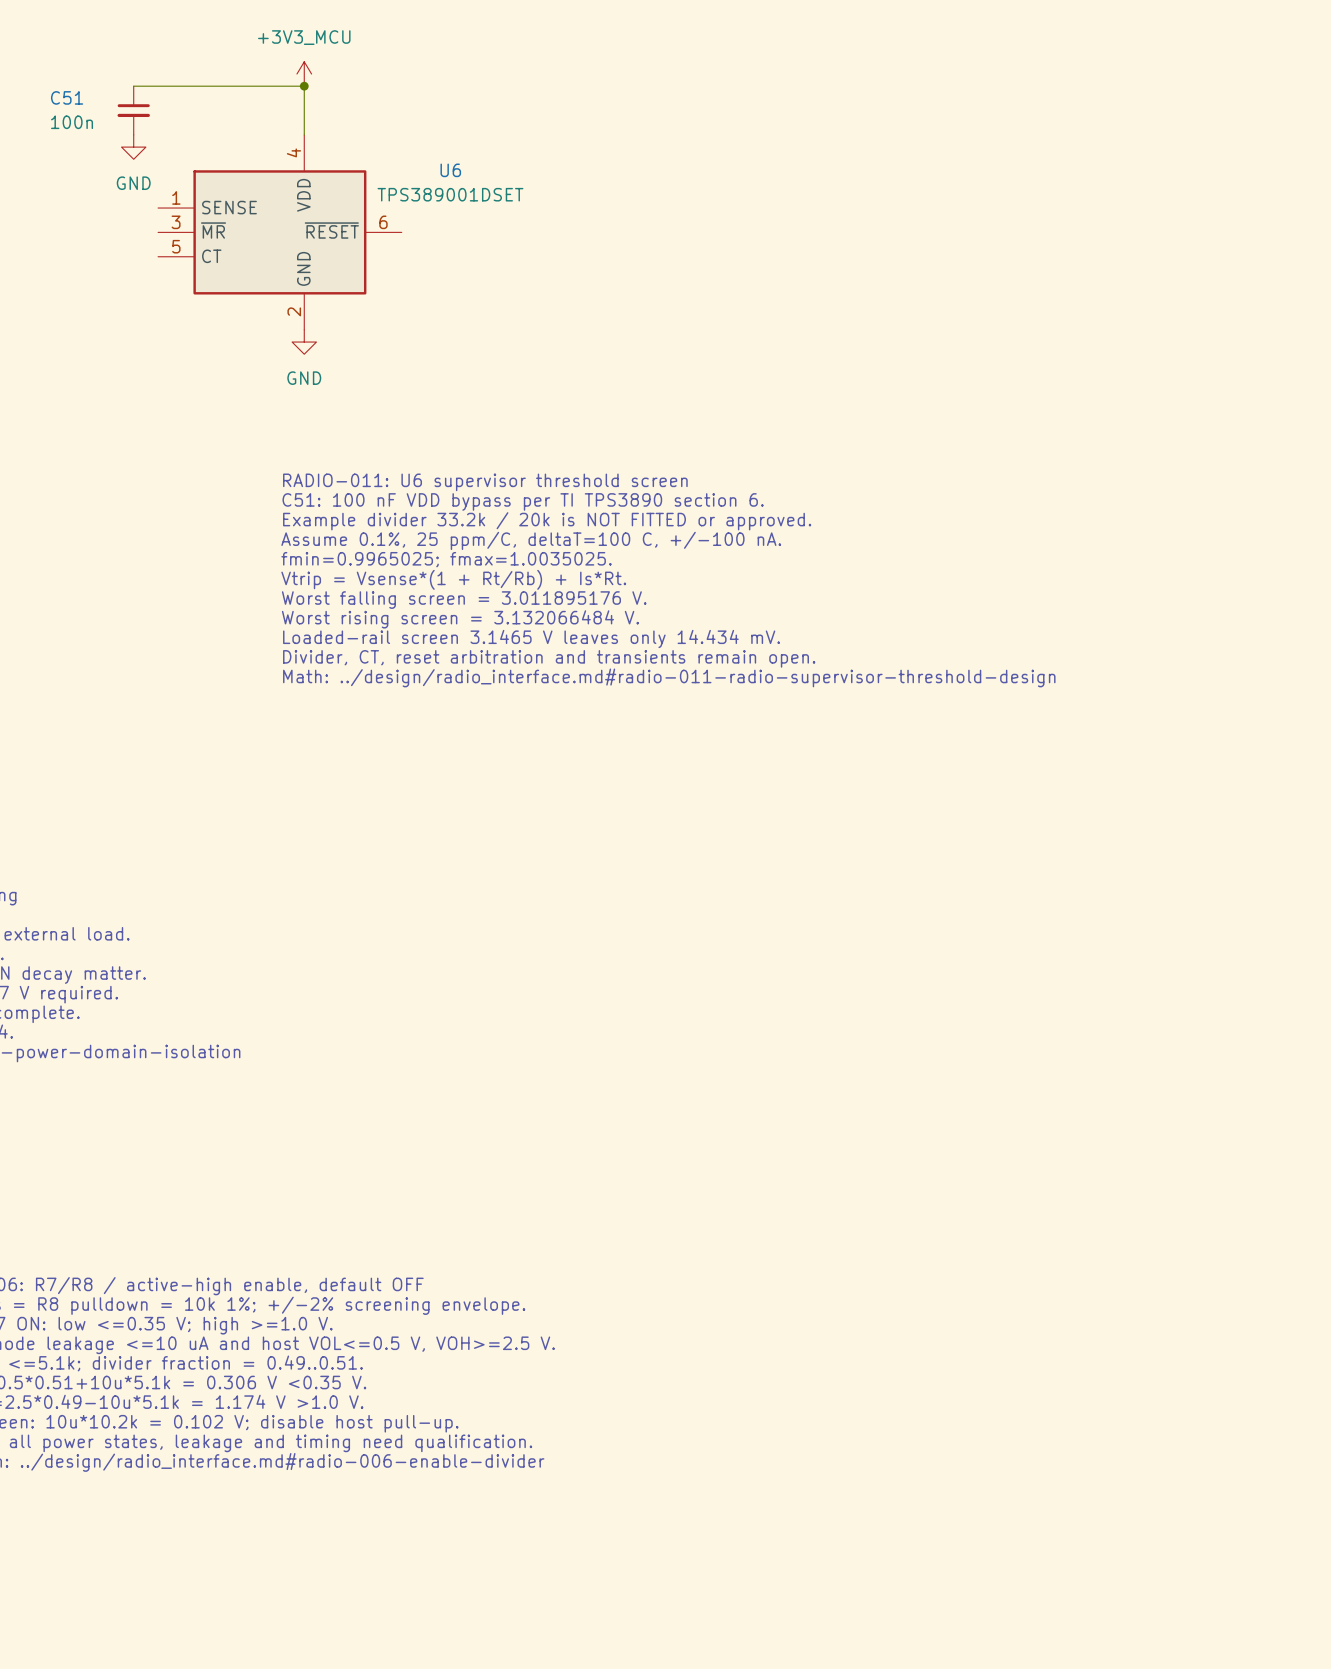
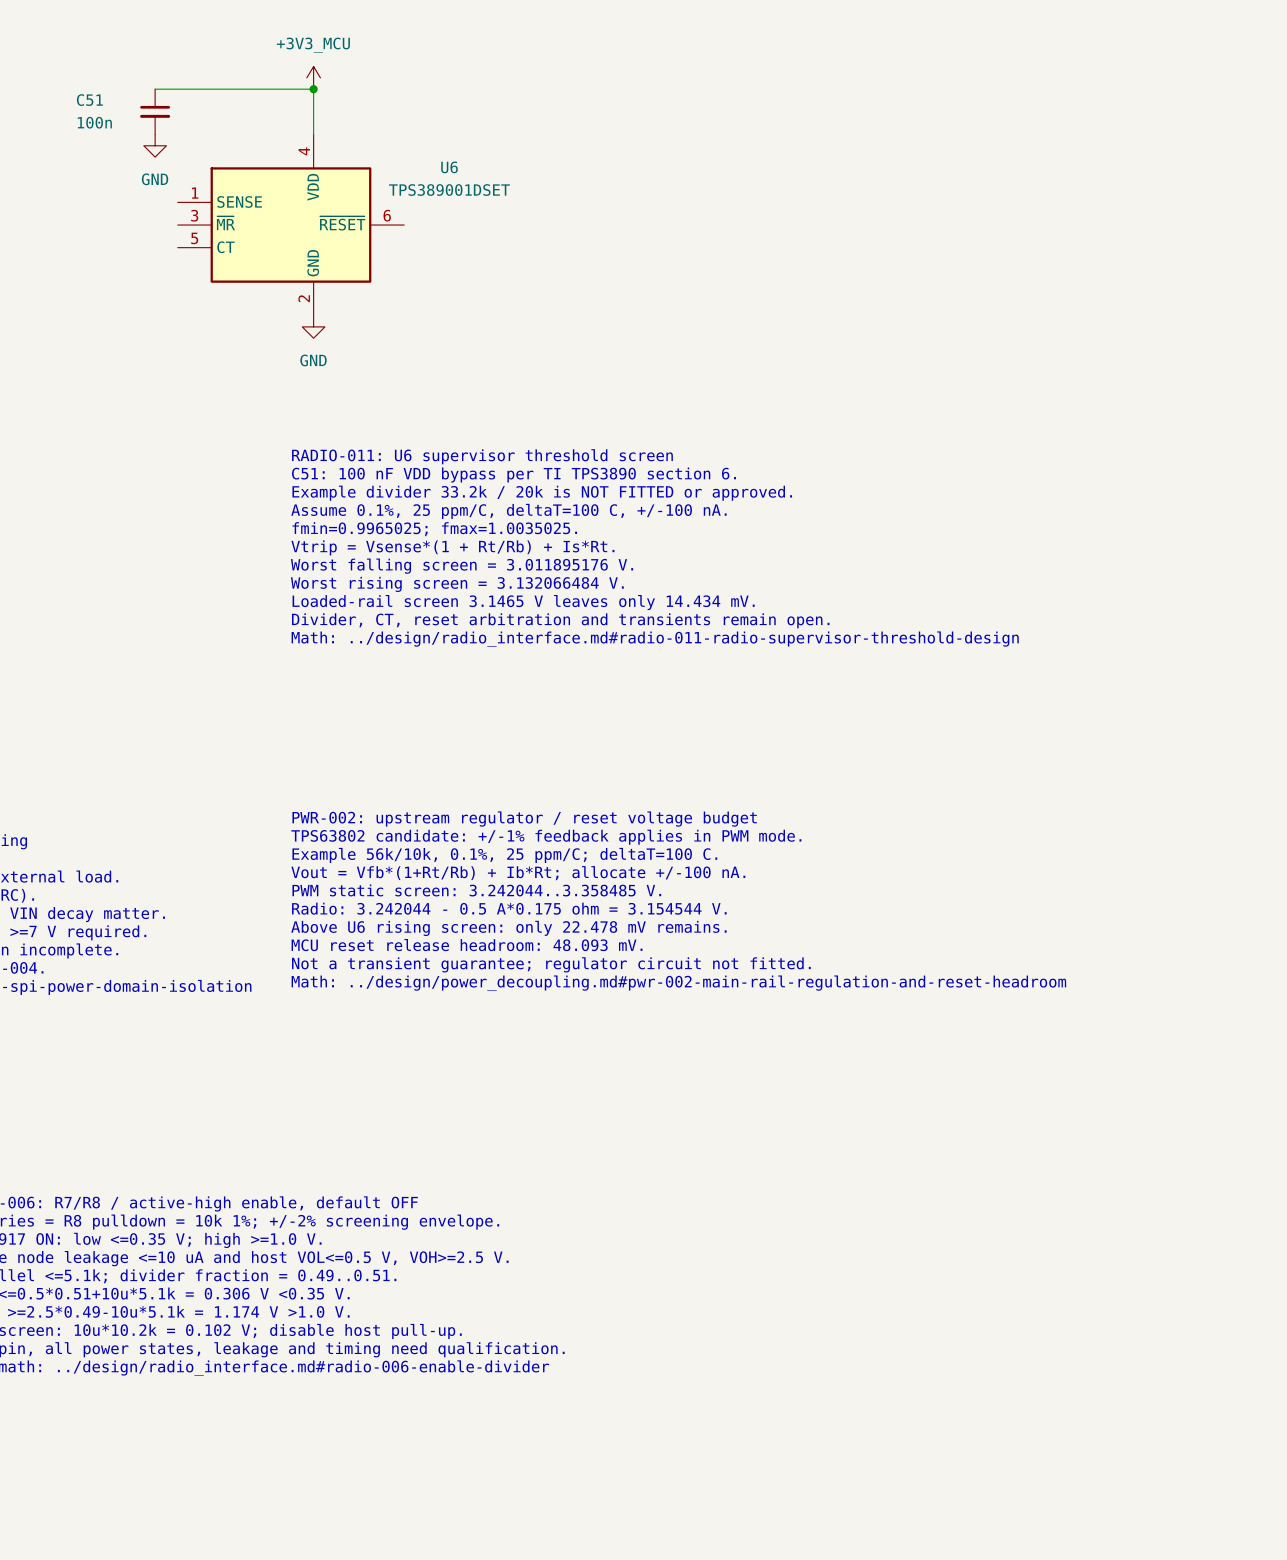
text: none -> PWR-002: upstream regulator / reset voltage budget (524, 819)
text: none -> TPS63802 candidate: +/-1% feedback applies in PWM mode. (546, 837)
text: none -> Example 56k/10k, 0.1%, 25 ppm/C; deltaT=100 C. (504, 855)
text: none -> Vout = Vfb*(1+Rt/Rb) + Ib*Rt; allocate +/-100 nA. (518, 873)
text: none -> PWM static screen: 3.242044..3.358485 V. (476, 890)
text: none -> Radio: 3.242044 - 0.5 A*0.175 ohm = 3.154544 V. (509, 908)
text: none -> Above U6 rising screen: only 22.478 mV remains. (508, 928)
text: none -> MCU reset release headroom: 48.093 mV. (467, 945)
text: none -> Not a transient guarantee; regulator circuit not fitted. (551, 964)
text: none -> Math: ../design/power_decoupling.md#pwr-002-main-rail-regulation-and-reset-headroom (678, 983)

